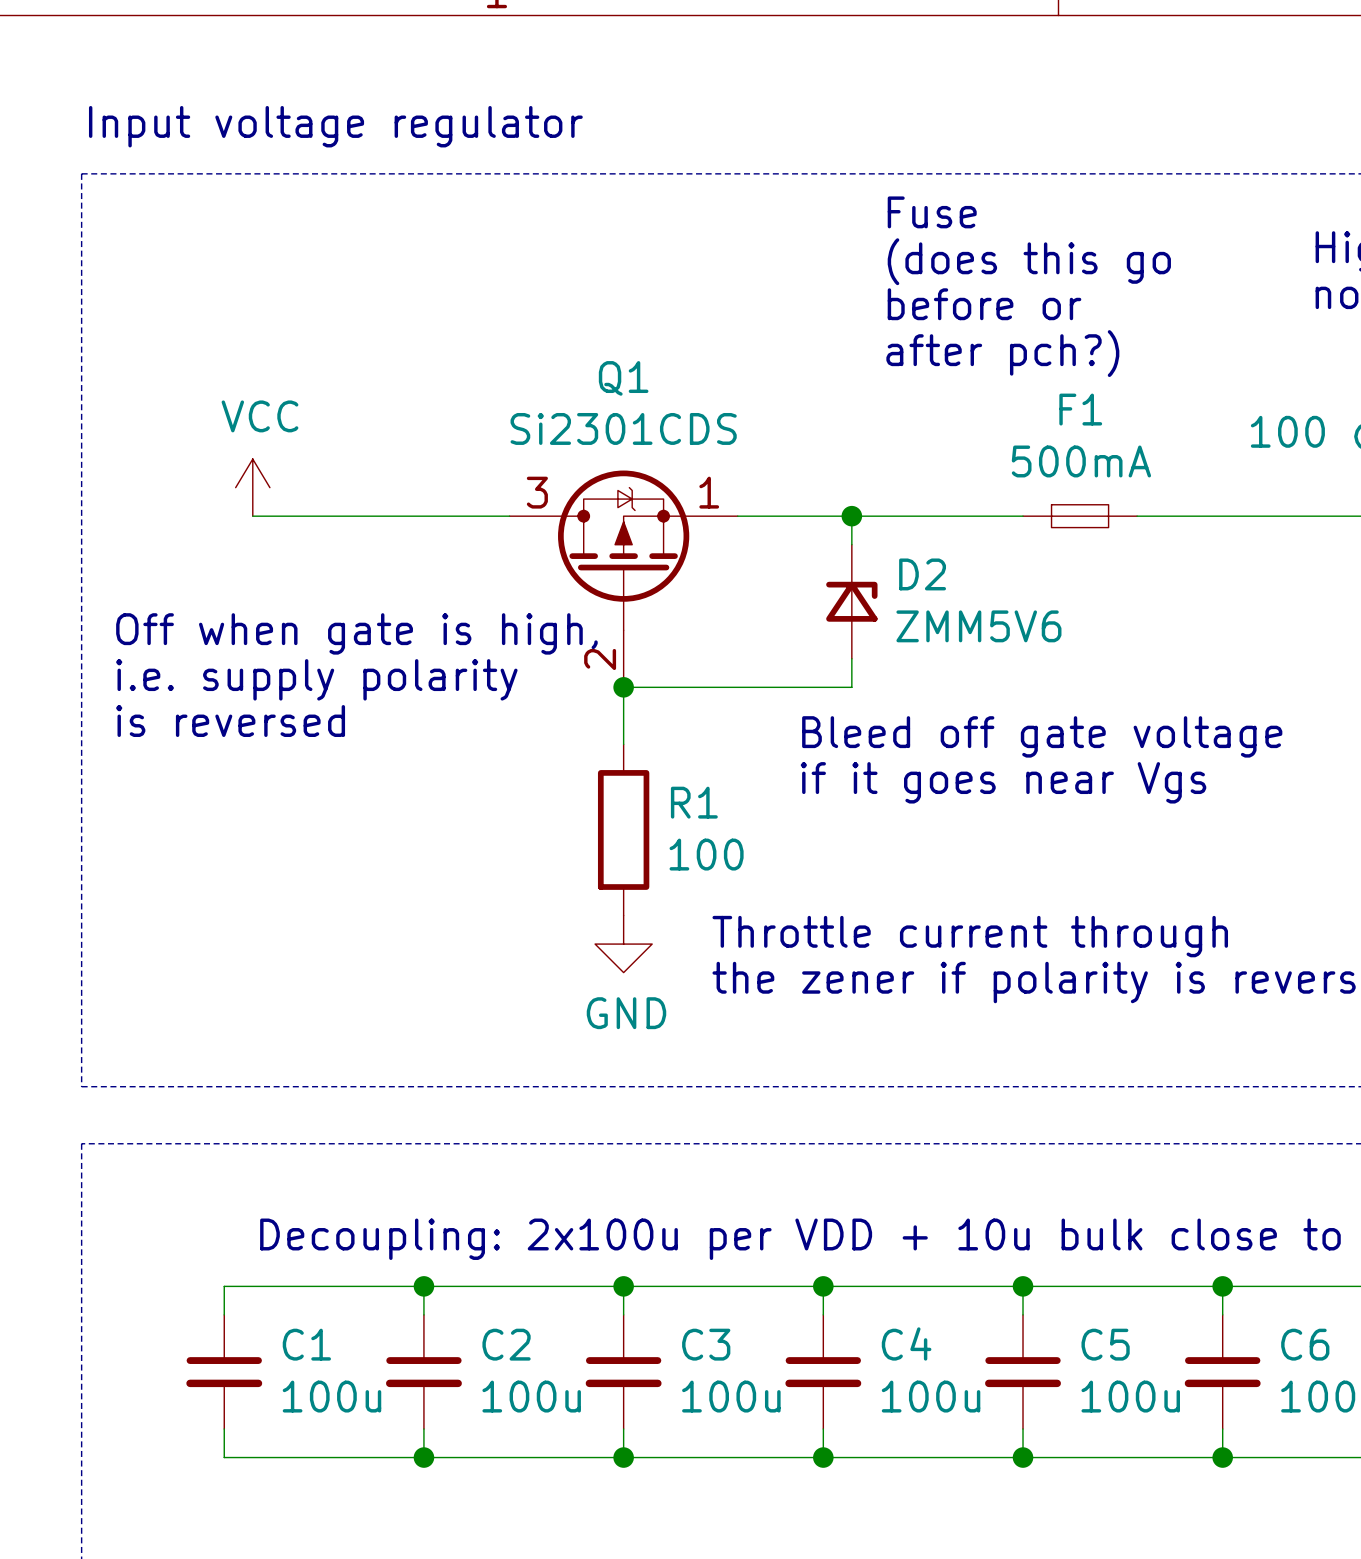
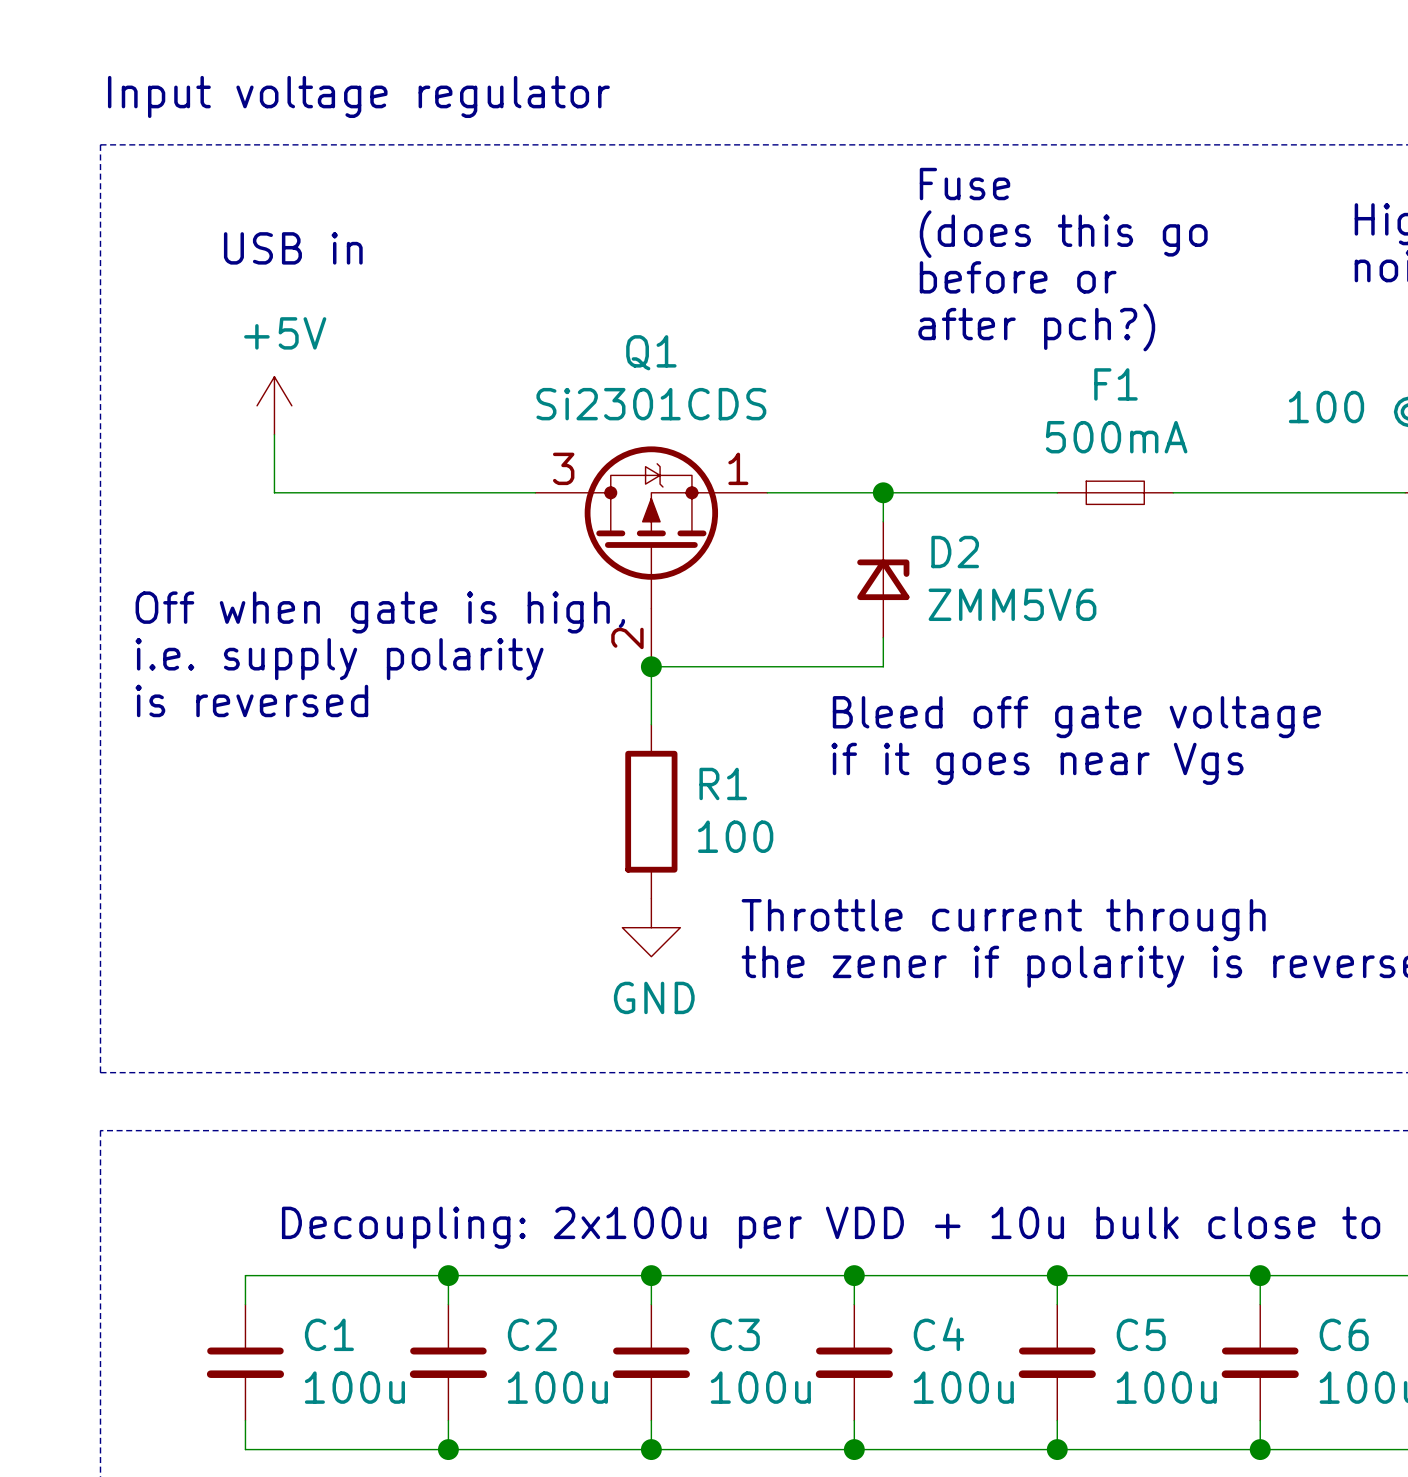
text: none -> USB in (293, 248)
power symbol: none -> +5V (274, 405)
power symbol: VCC (252, 487) -> none

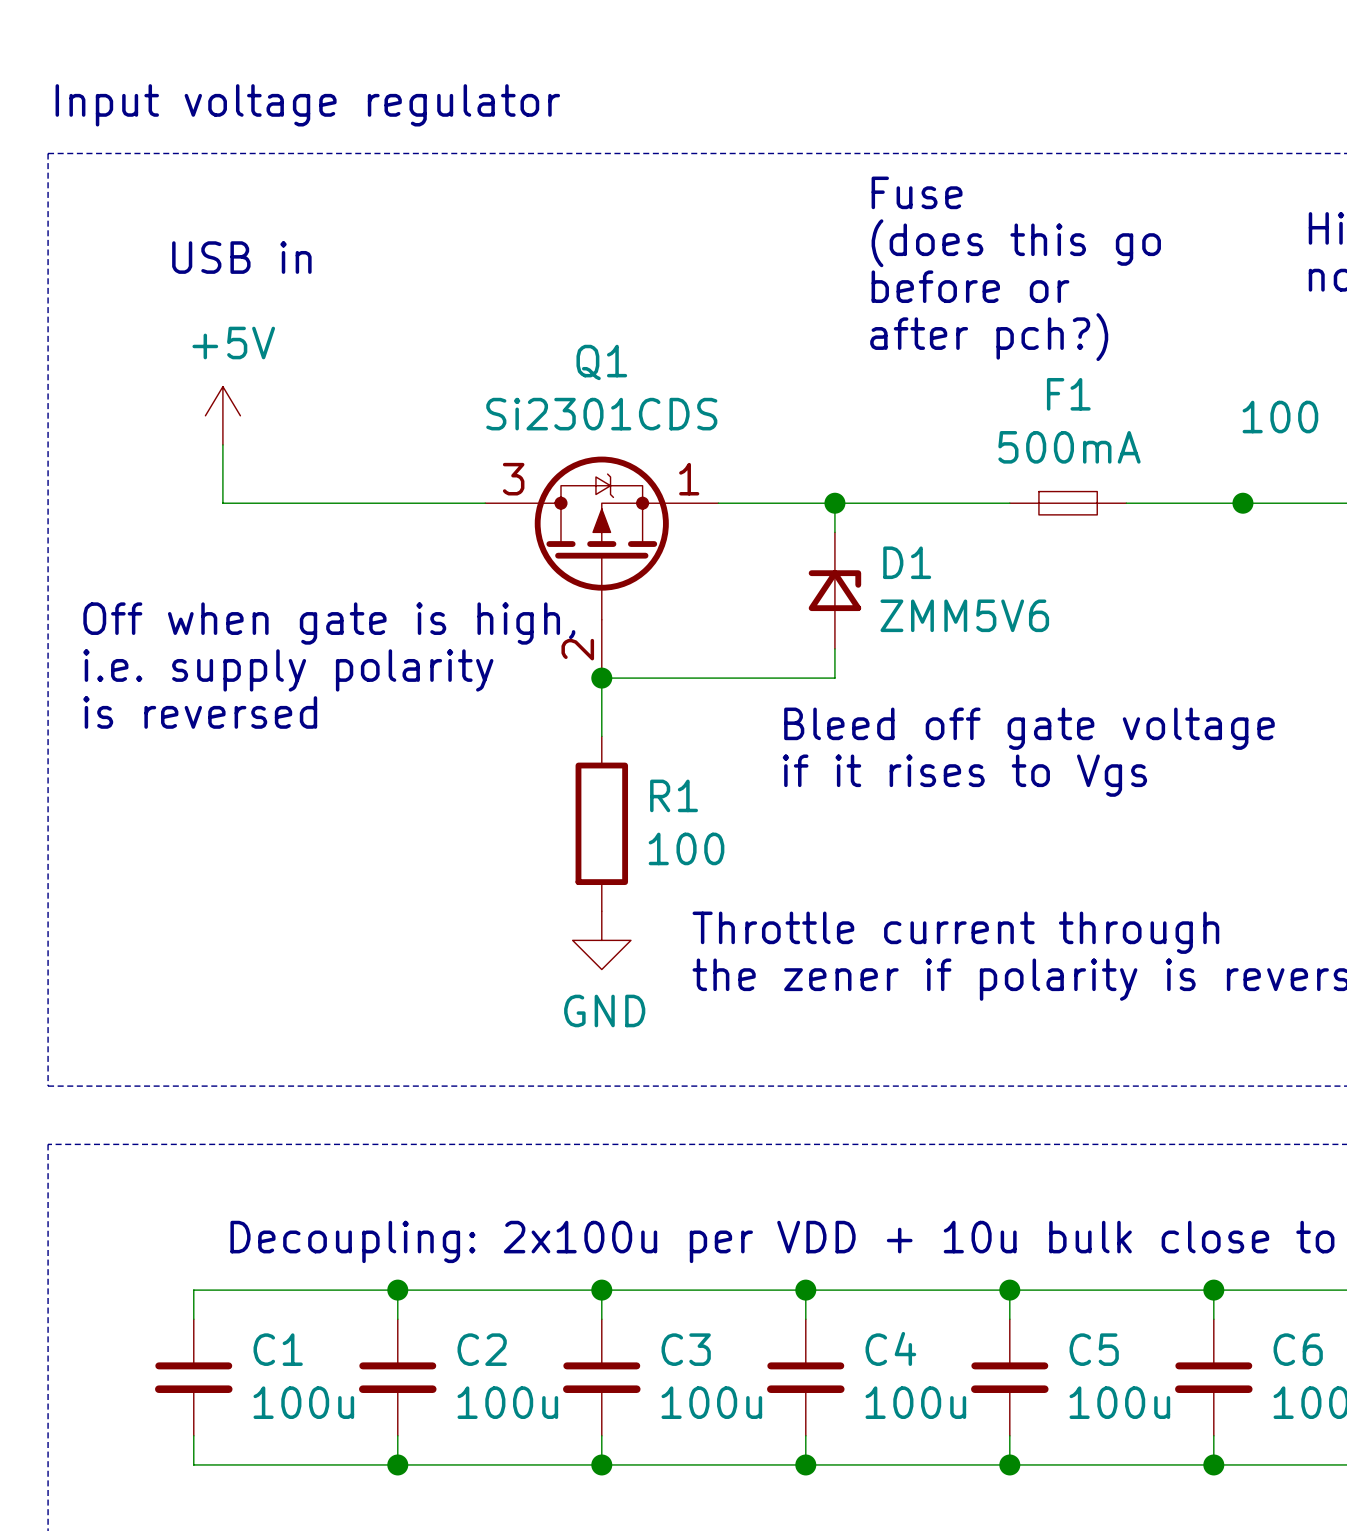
junction: none -> (1242, 503)
D2 name: D2 (955, 552) -> D1 (907, 562)
text: if it goes near Vgs (1037, 763) -> if it rises to Vgs (964, 775)

